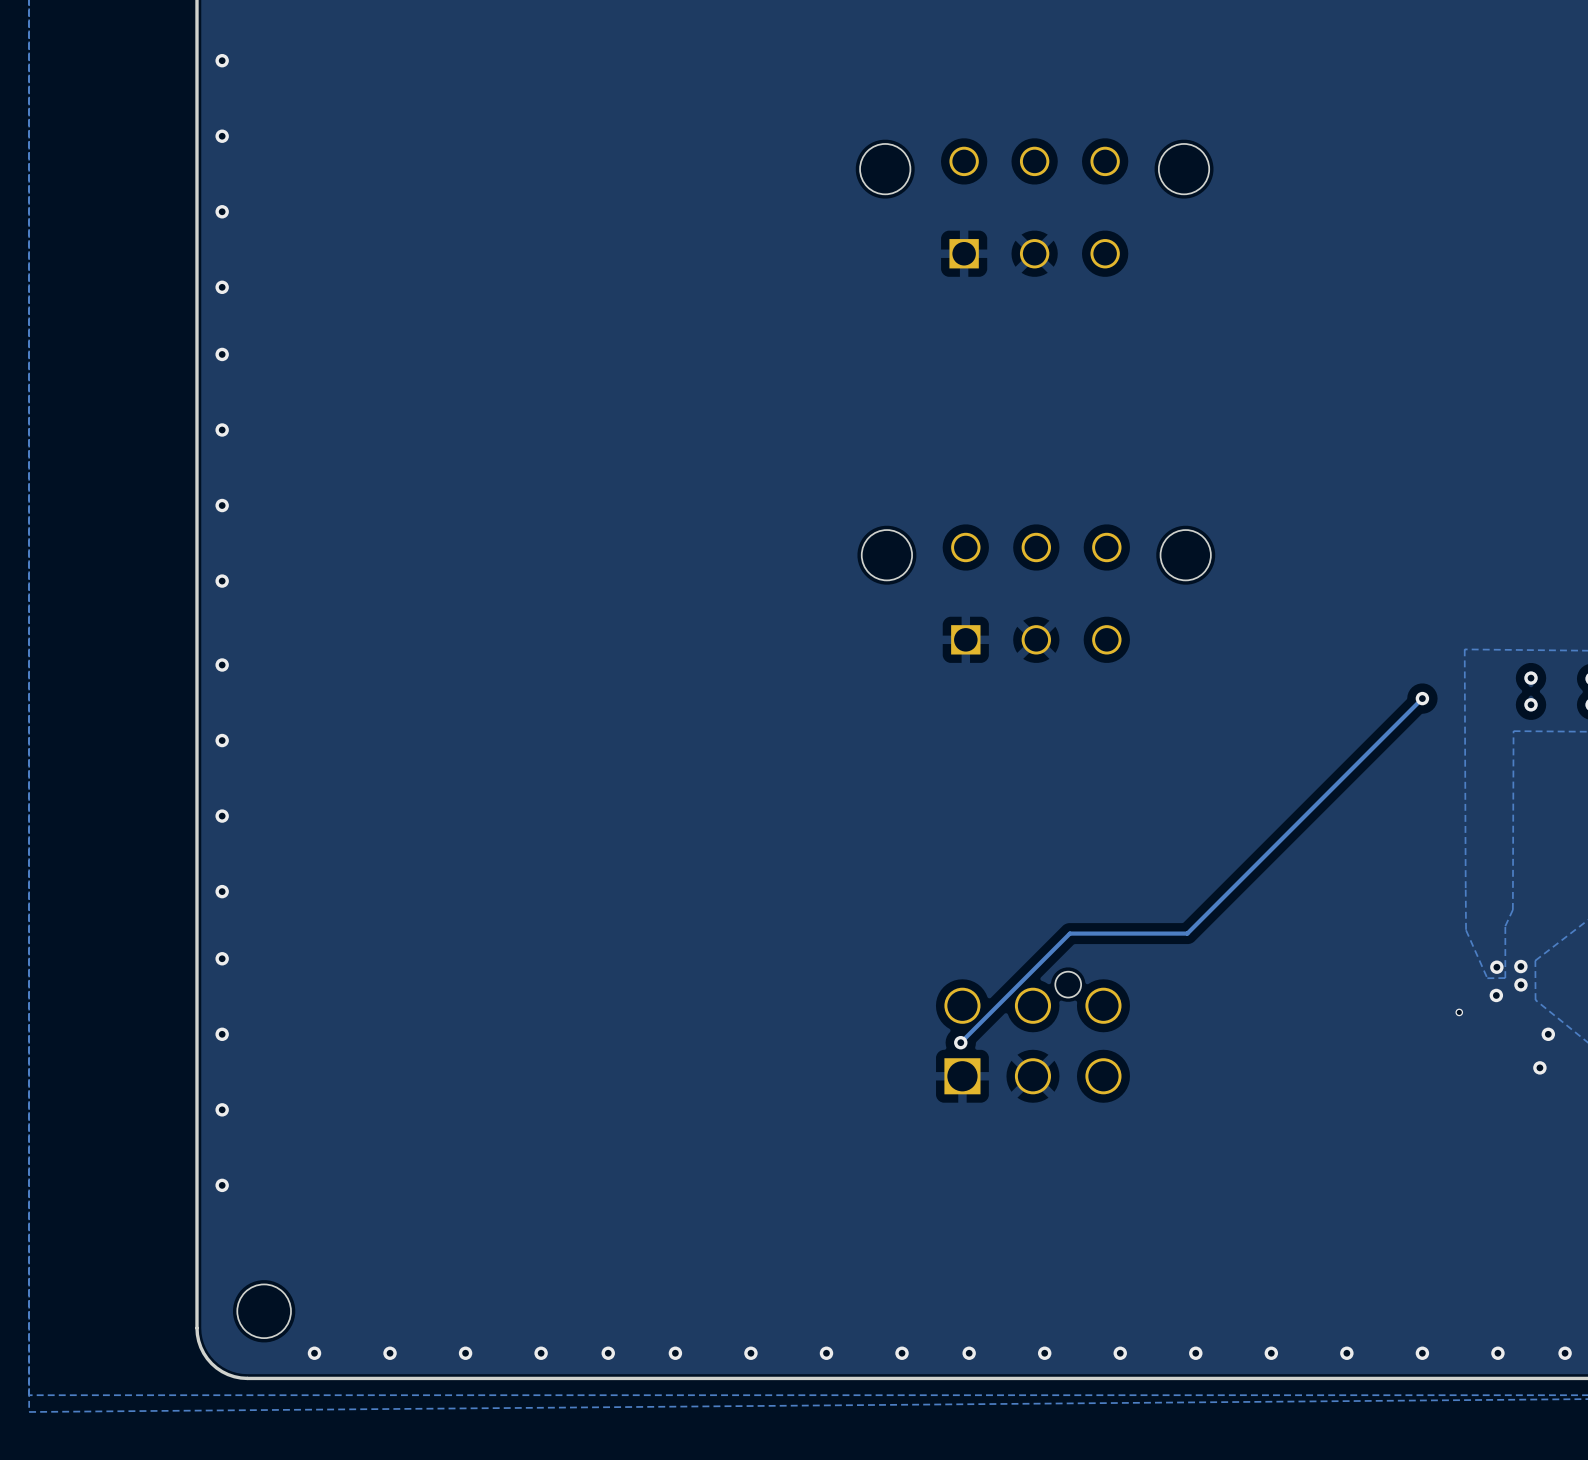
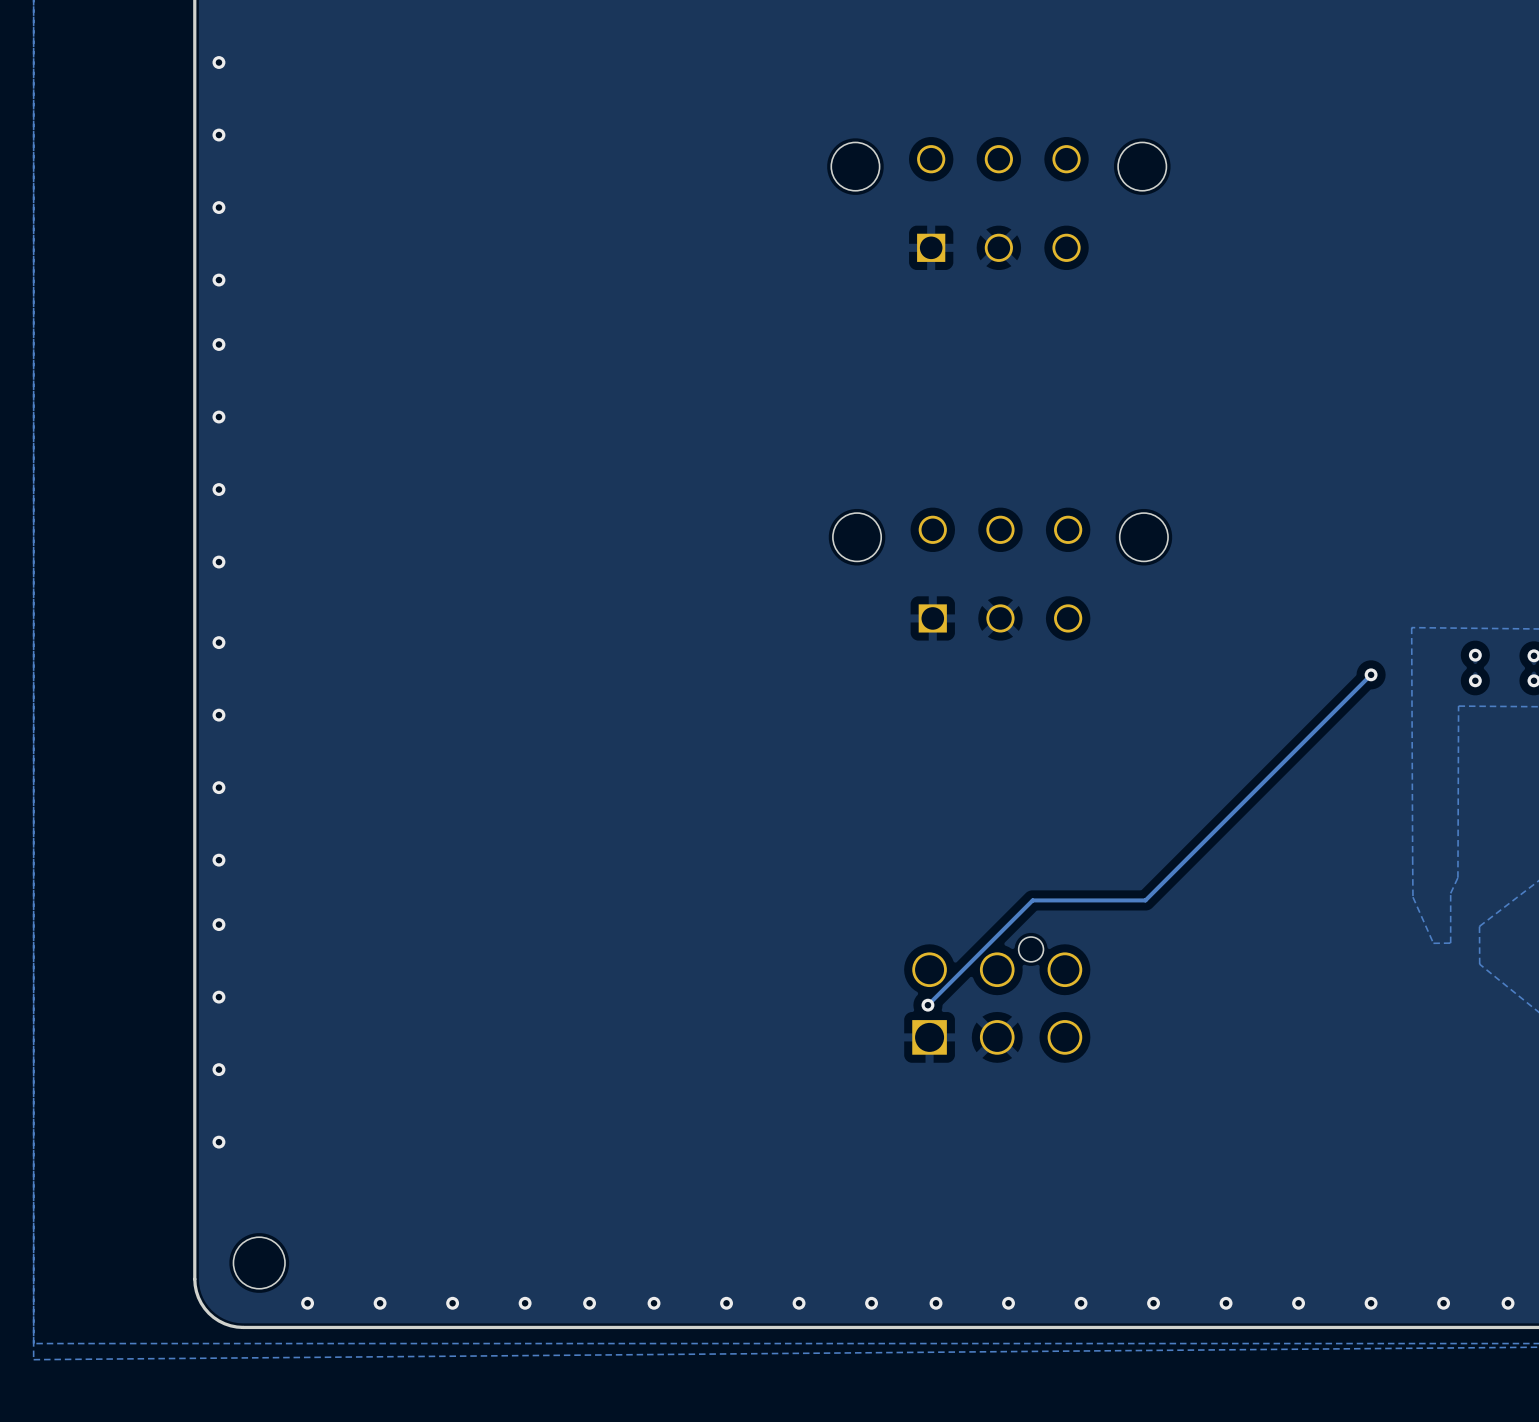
via: (1520, 966) -> none
via: (1496, 967) -> none
via: (1520, 984) -> none
via: (1496, 995) -> none
via: (1459, 1012) -> none
via: (1548, 1034) -> none
via: (1539, 1067) -> none

